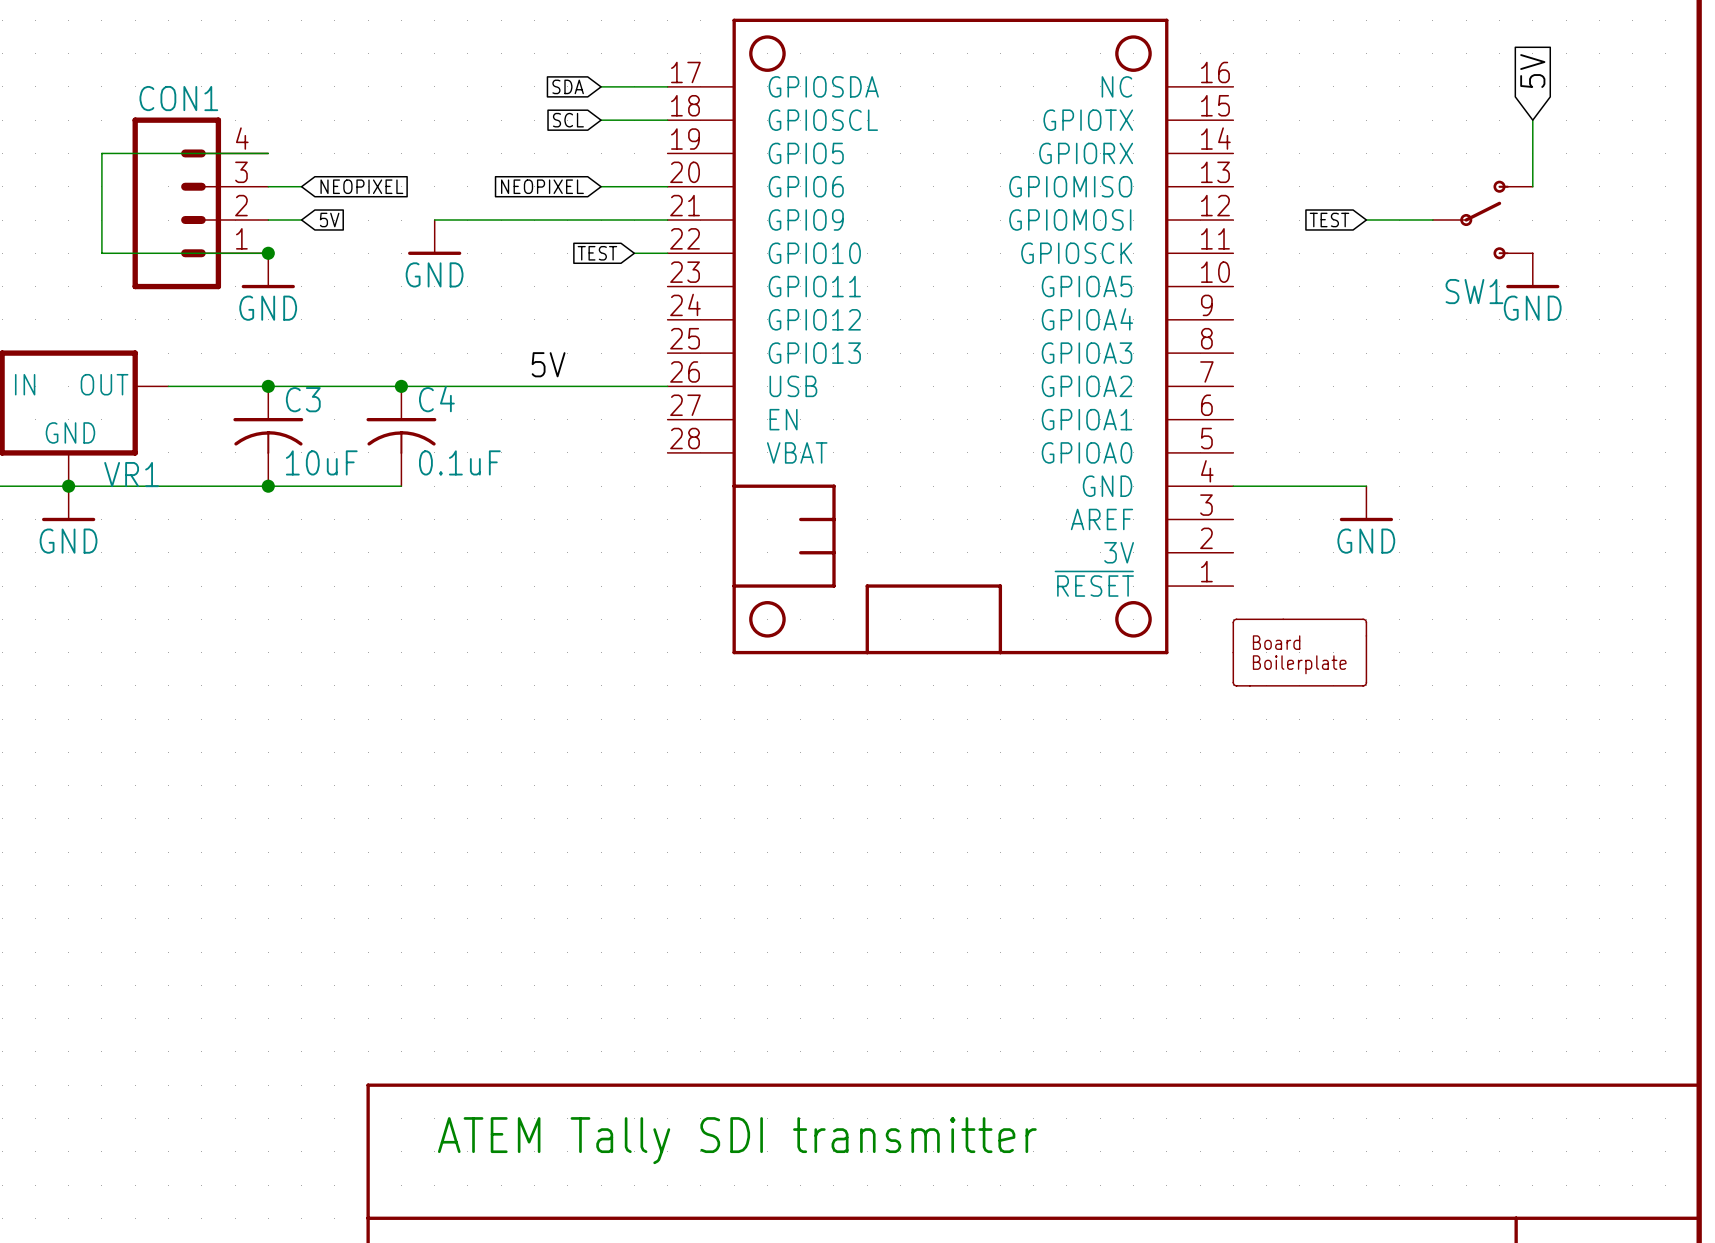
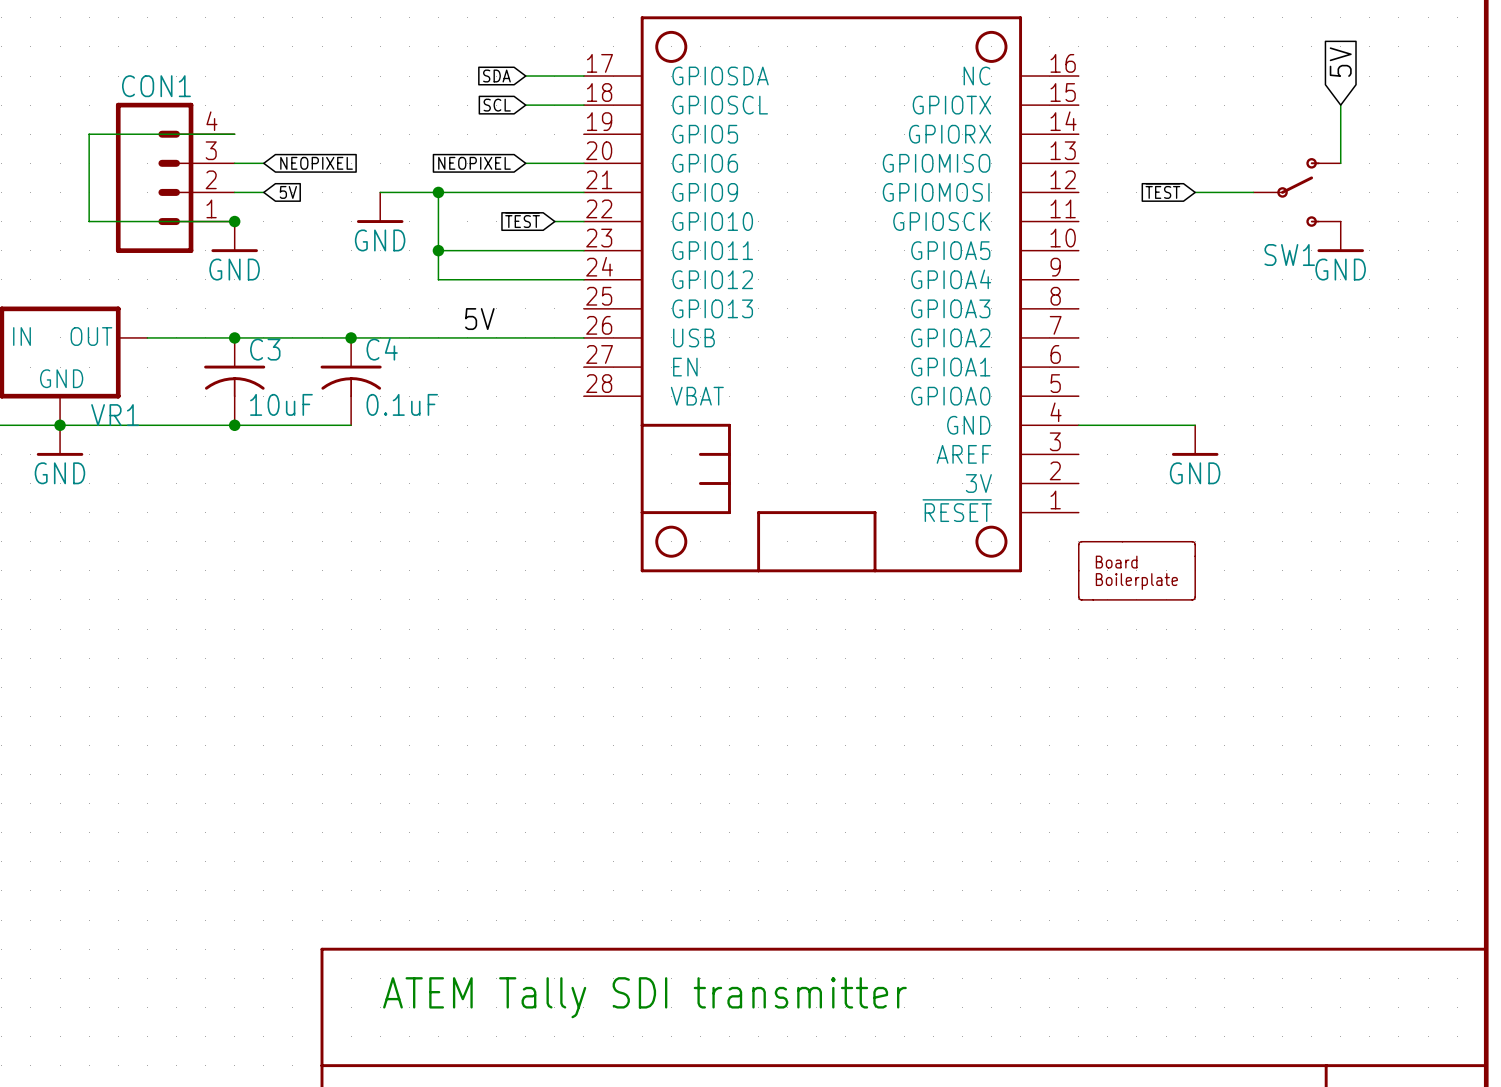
wire: none -> (438, 192) (438, 279) (583, 279)
junction: none -> (438, 192)
global label: TEST (1329, 220) -> ~{TEST} (1162, 191)
global label: TEST (597, 253) -> ~{TEST} (522, 220)
wire: none -> (438, 250) (583, 250)
junction: none -> (438, 250)

